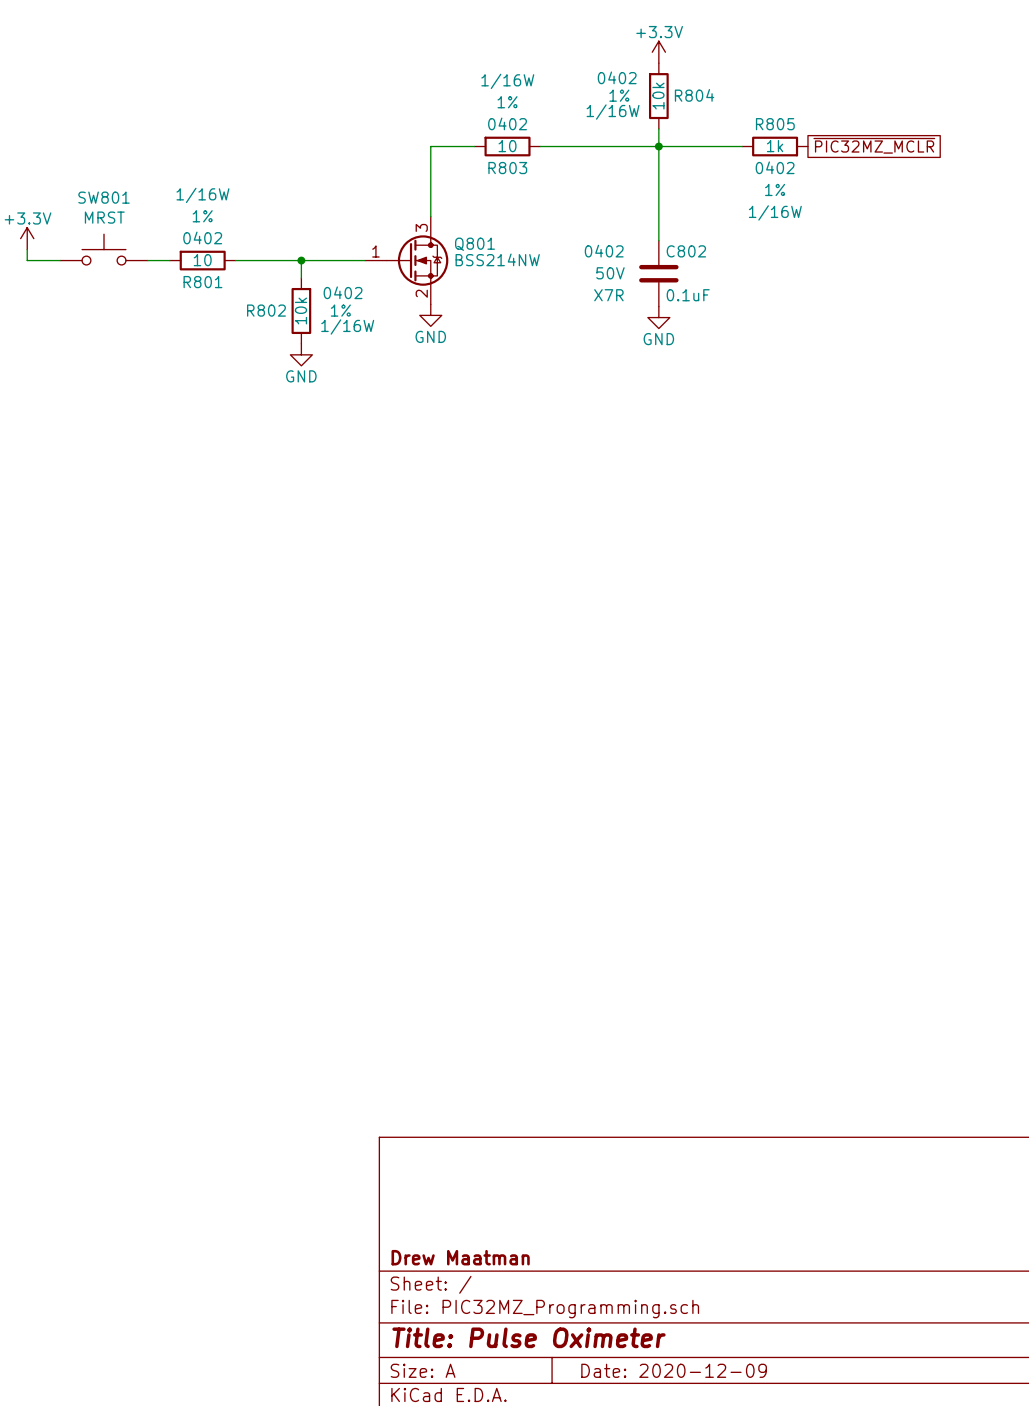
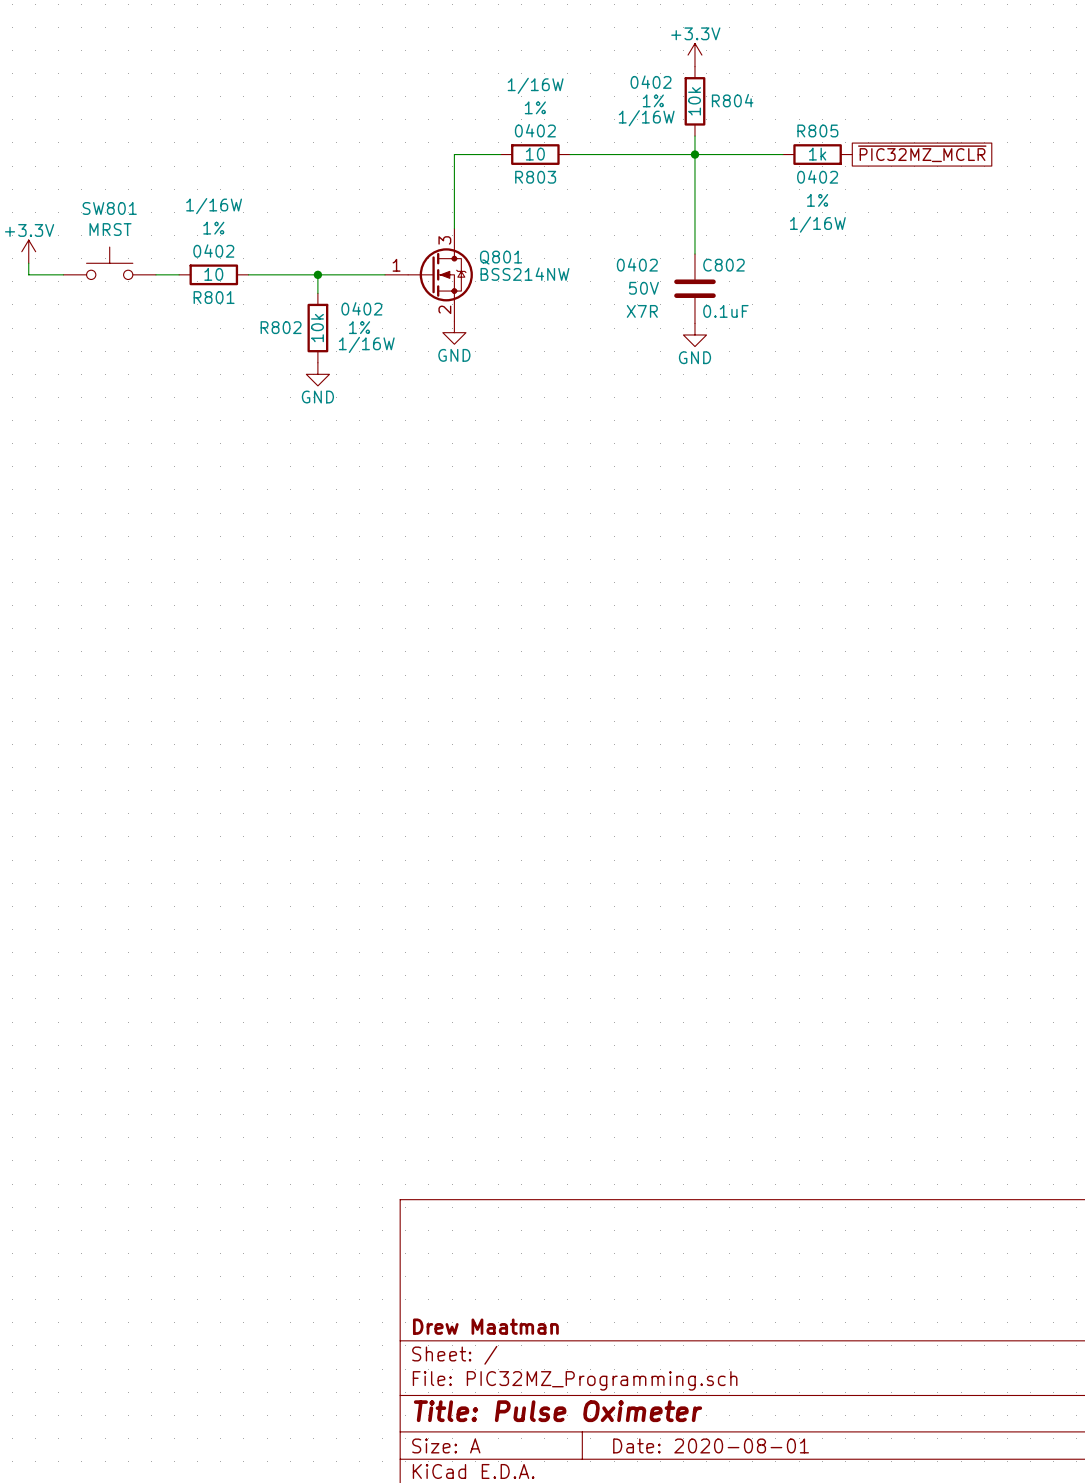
title block: Date: 2020-12-09 (674, 1370) -> Date: 2020-08-01 (711, 1445)

